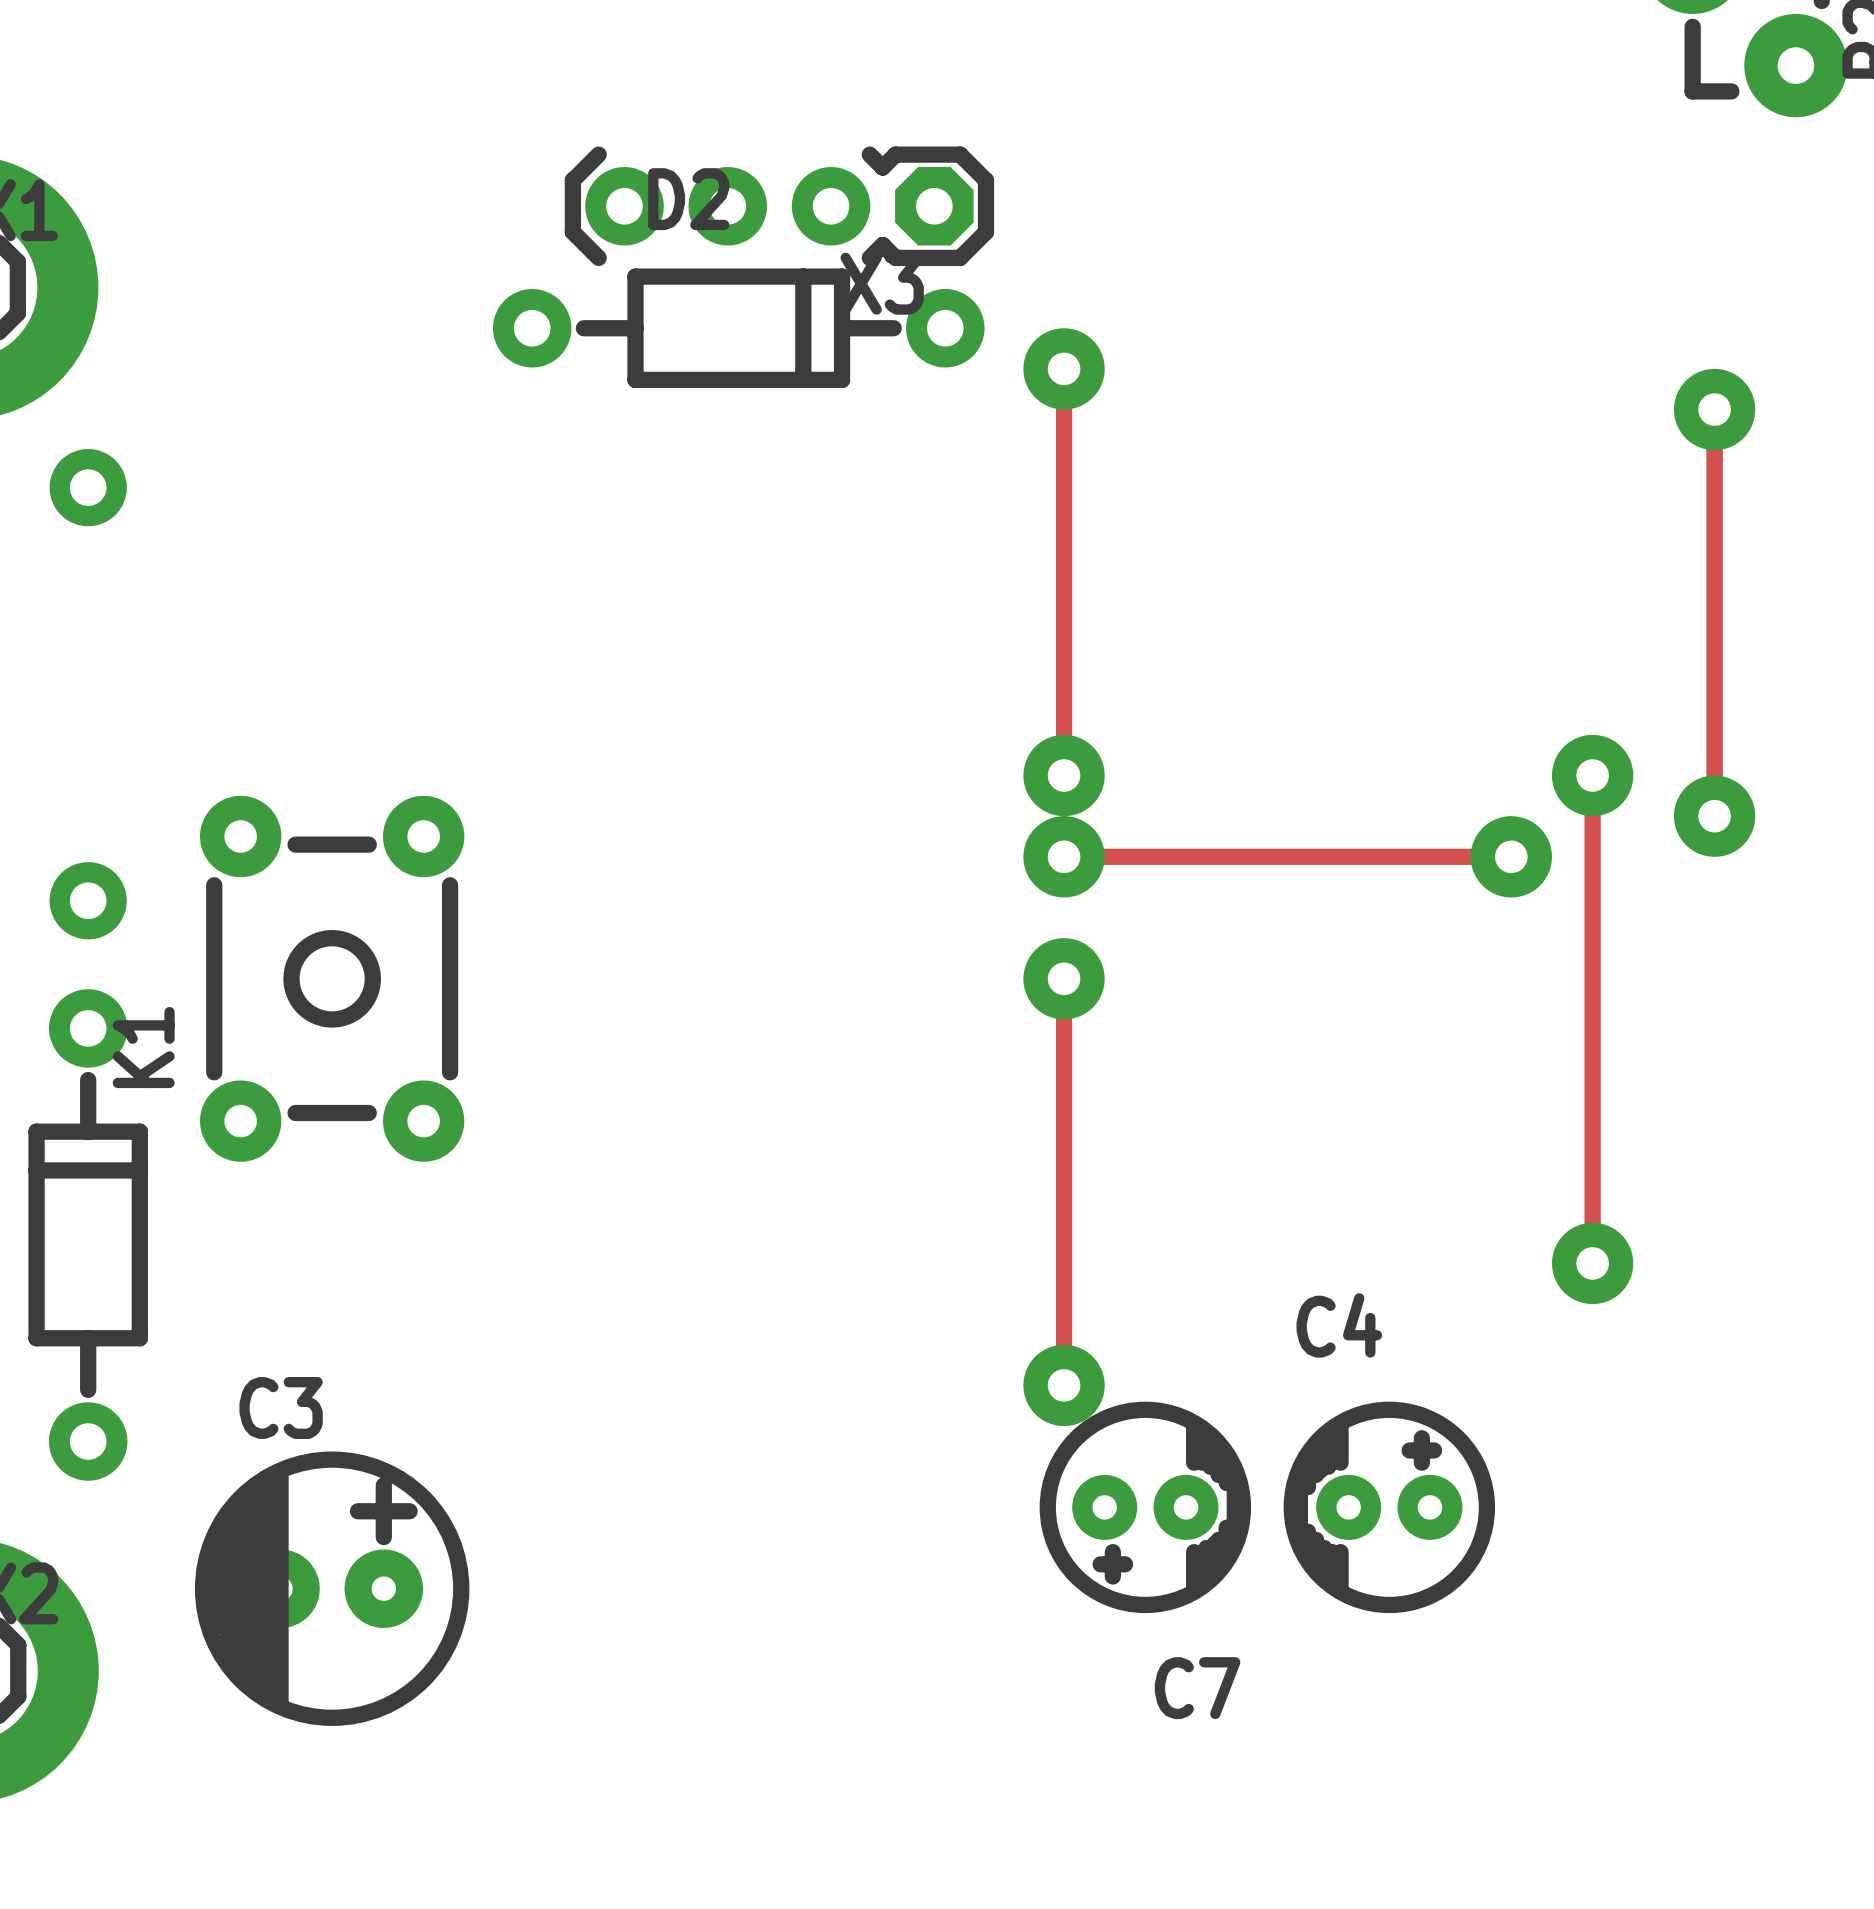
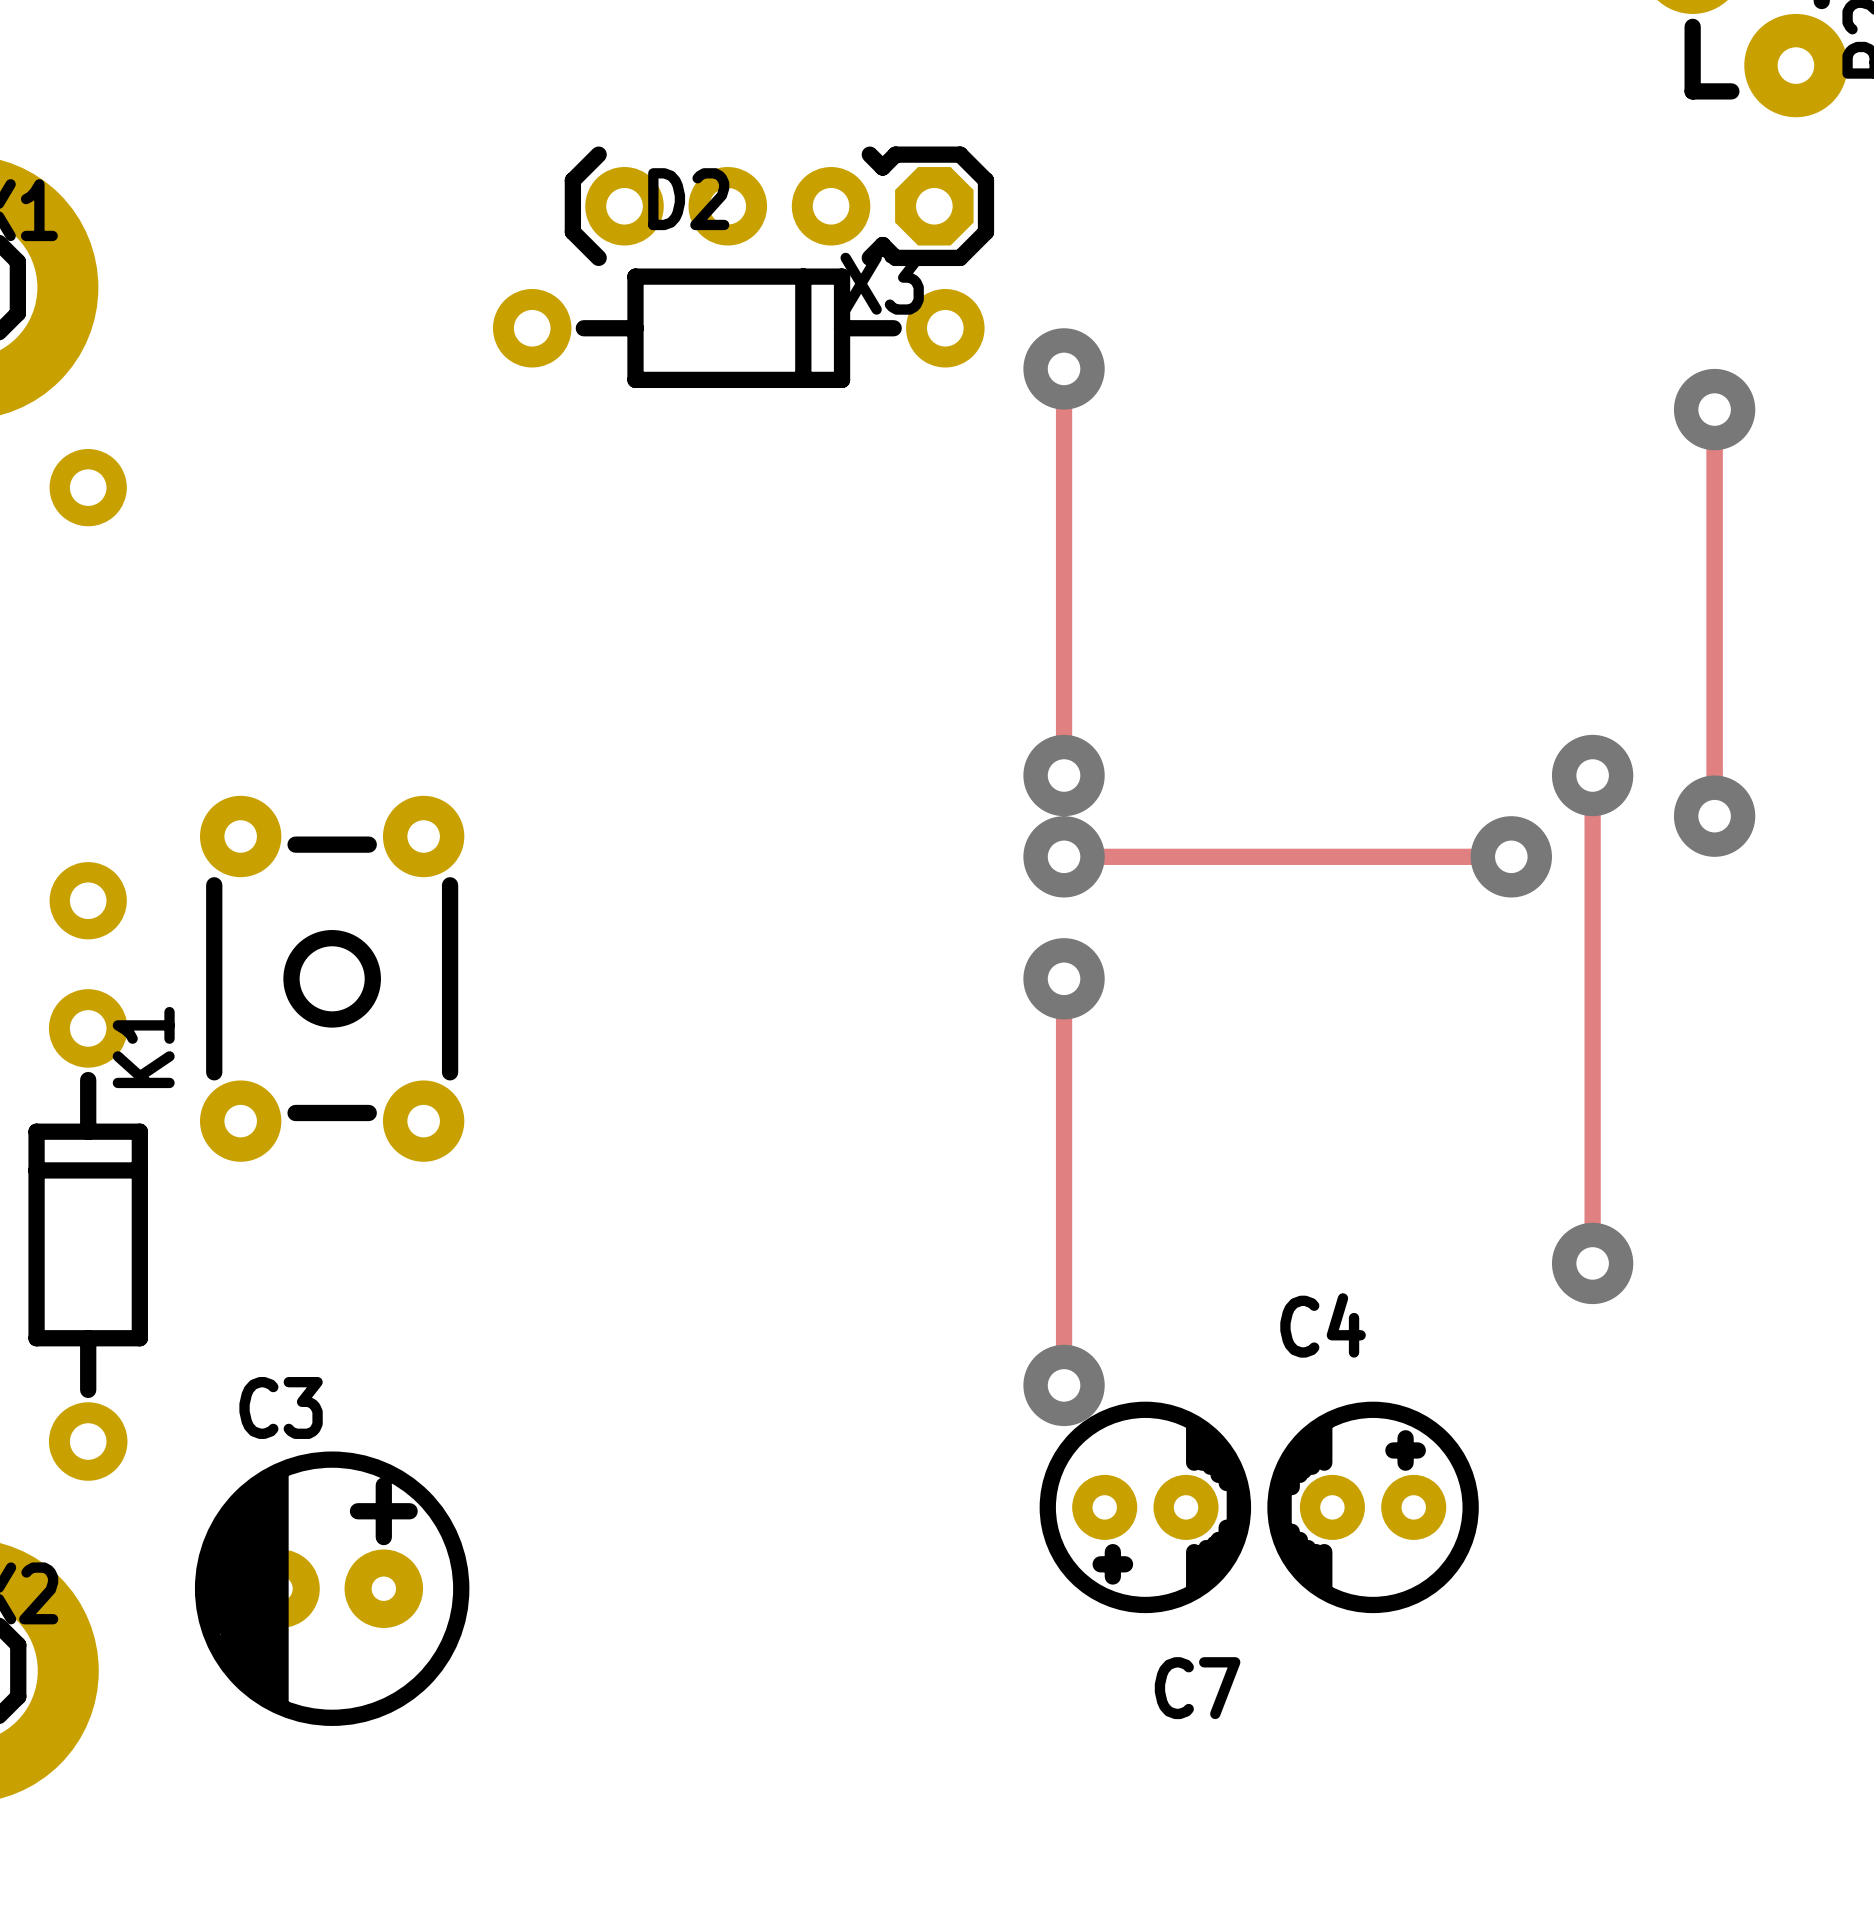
C4 position: (1389, 1507) -> (1373, 1507)

